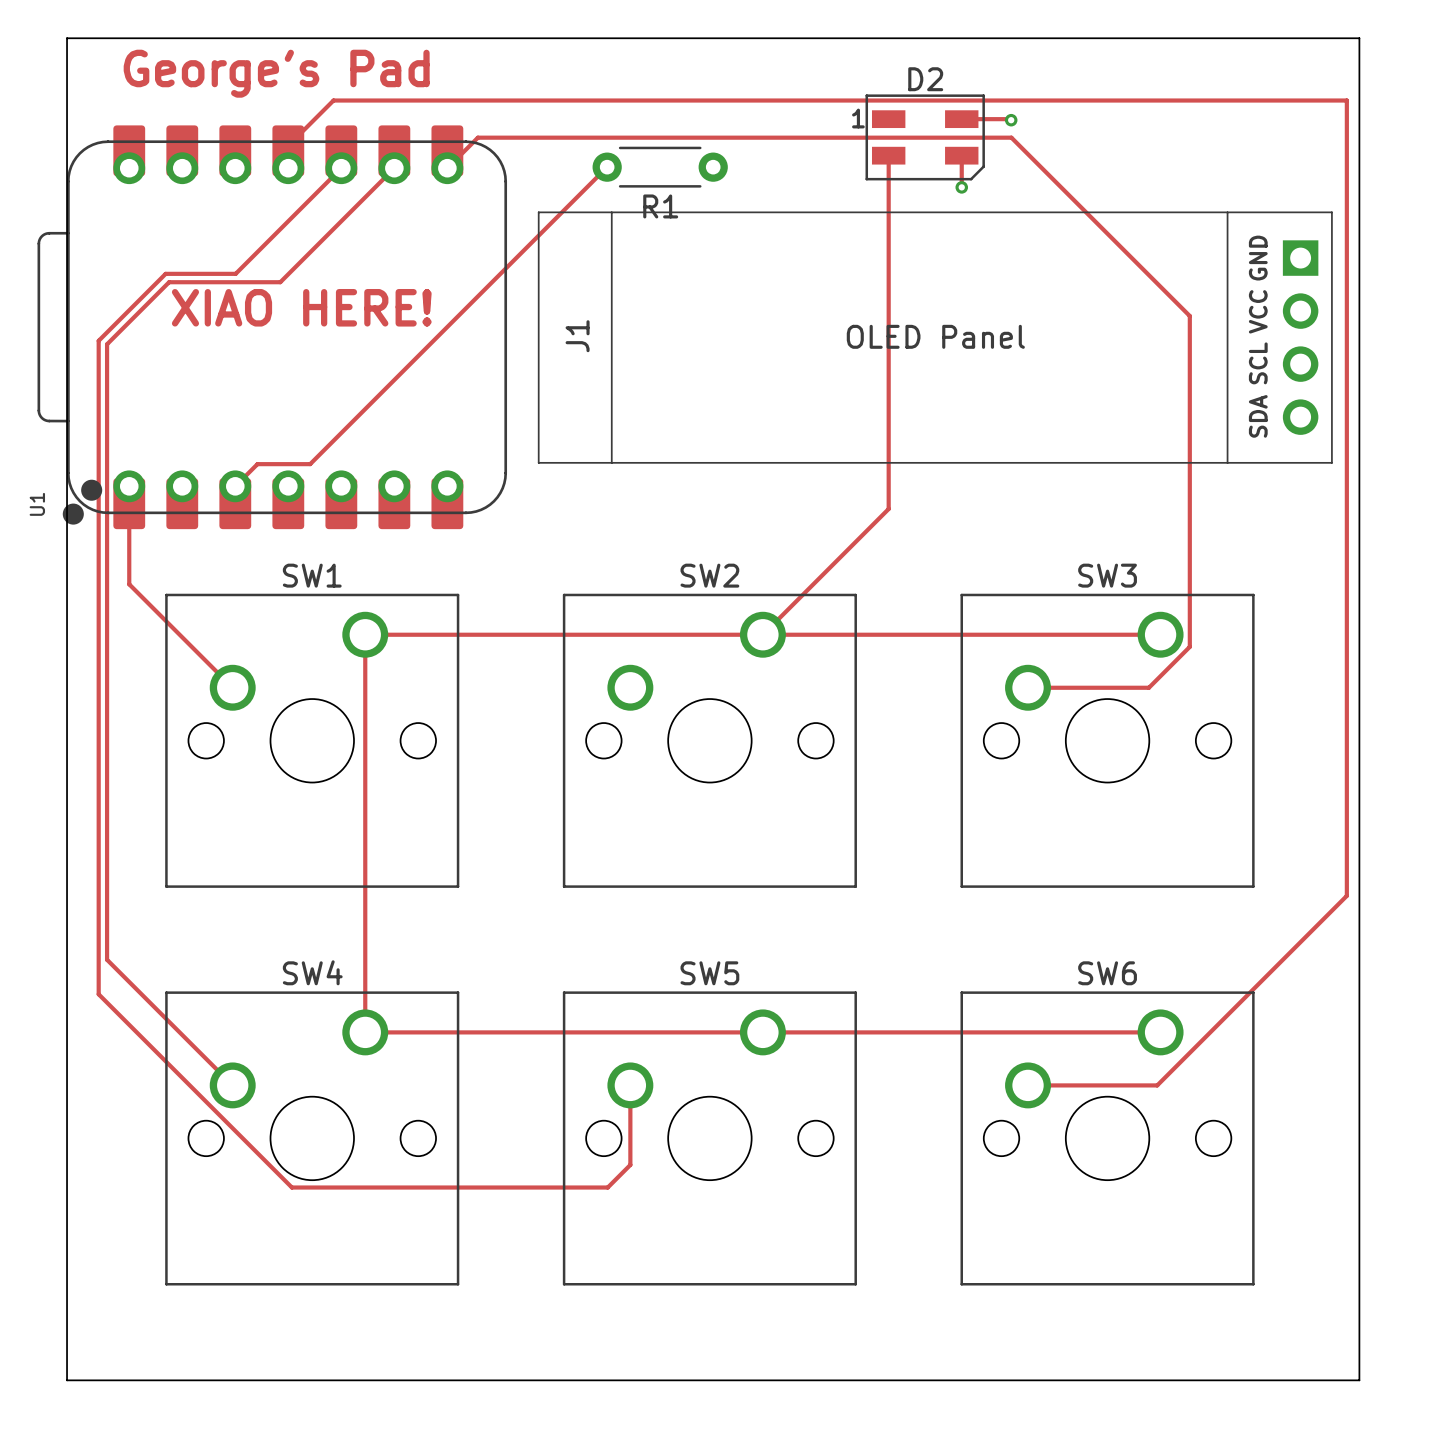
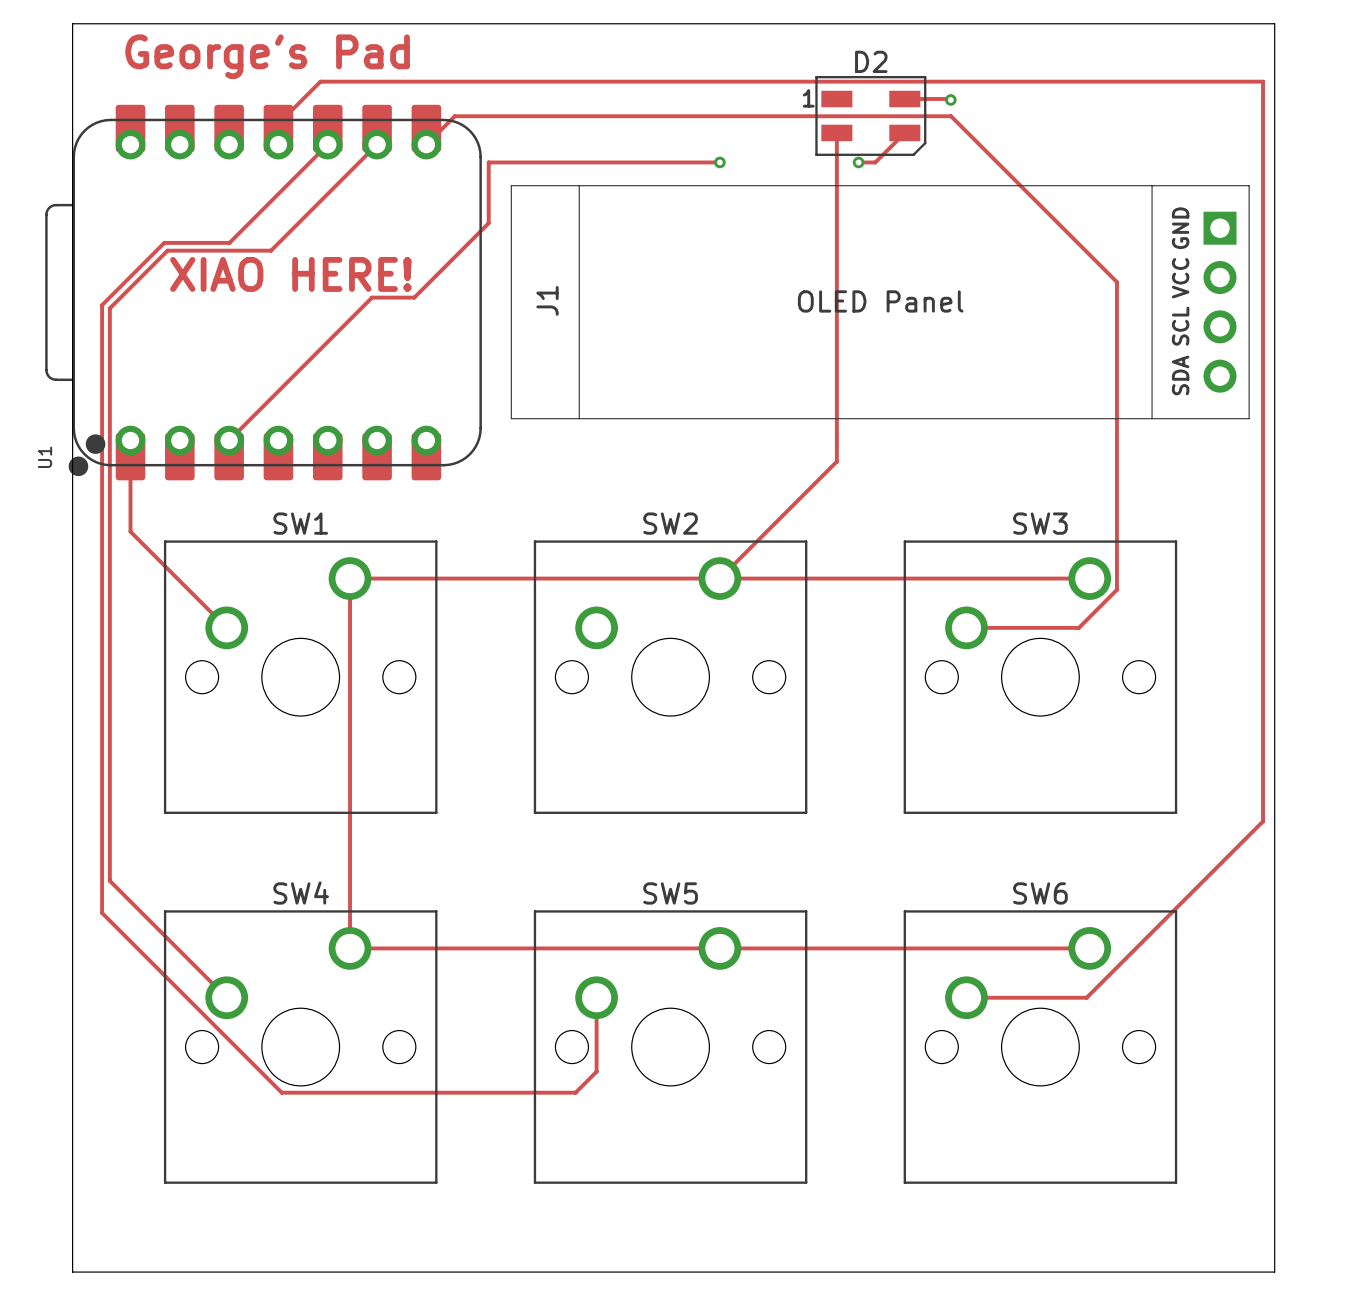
track: (961, 155) (961, 187) -> (904, 132) (875, 162) (858, 162)
track: (607, 167) (310, 464) (257, 464) -> (719, 162) (488, 162) (488, 223) (414, 297) (372, 297) (249, 419)
R1: (660, 167) -> none
via: none -> (719, 162)
via position: (961, 187) -> (858, 162)

